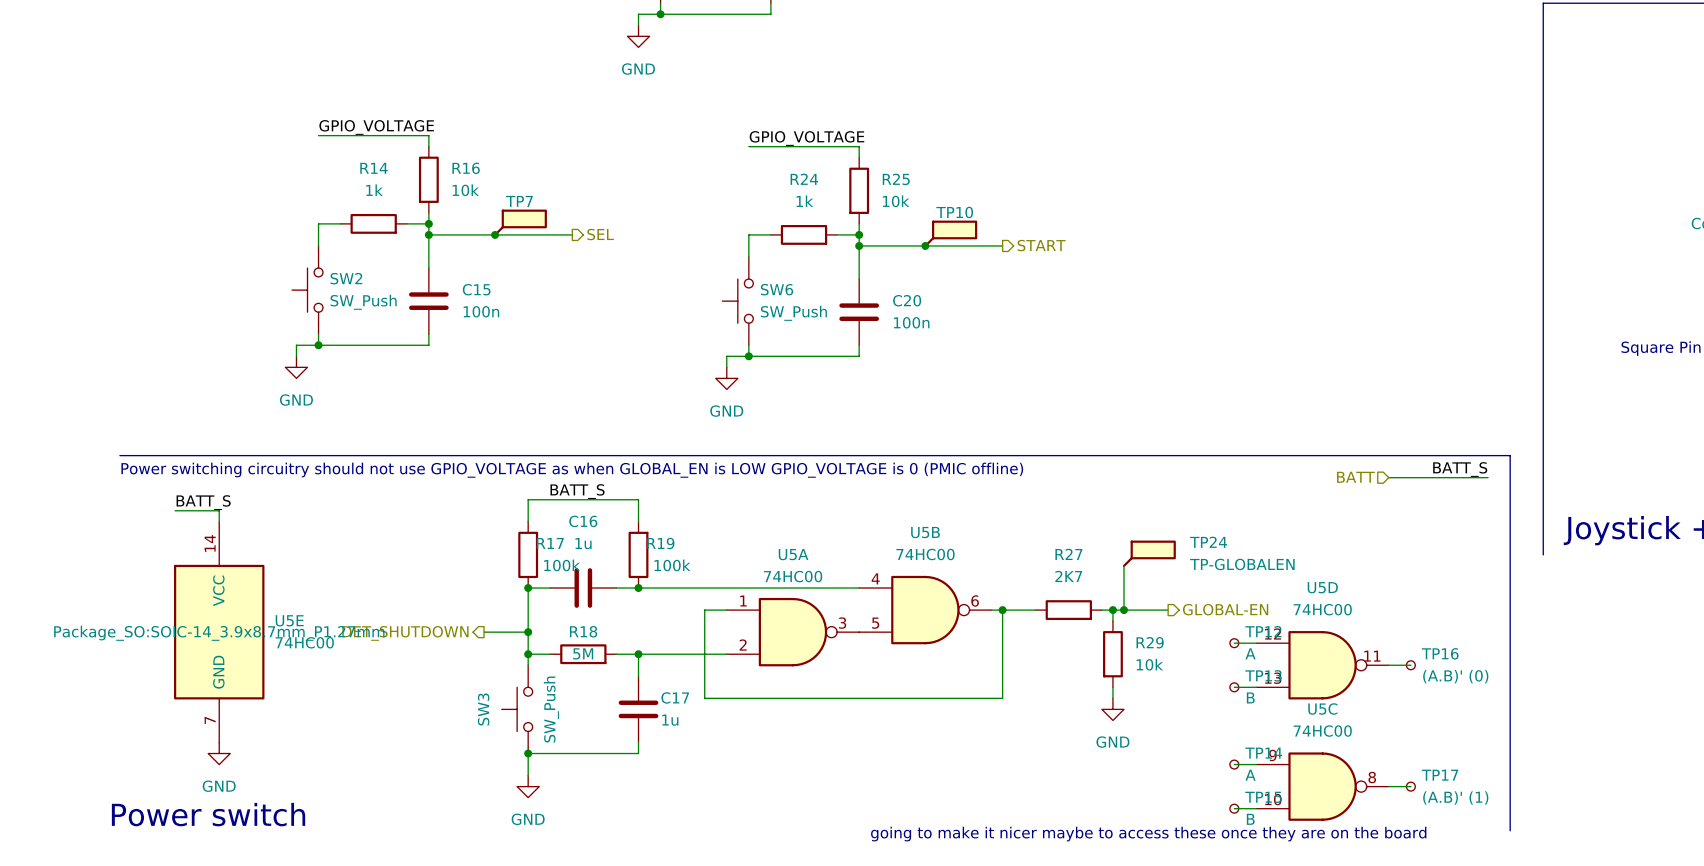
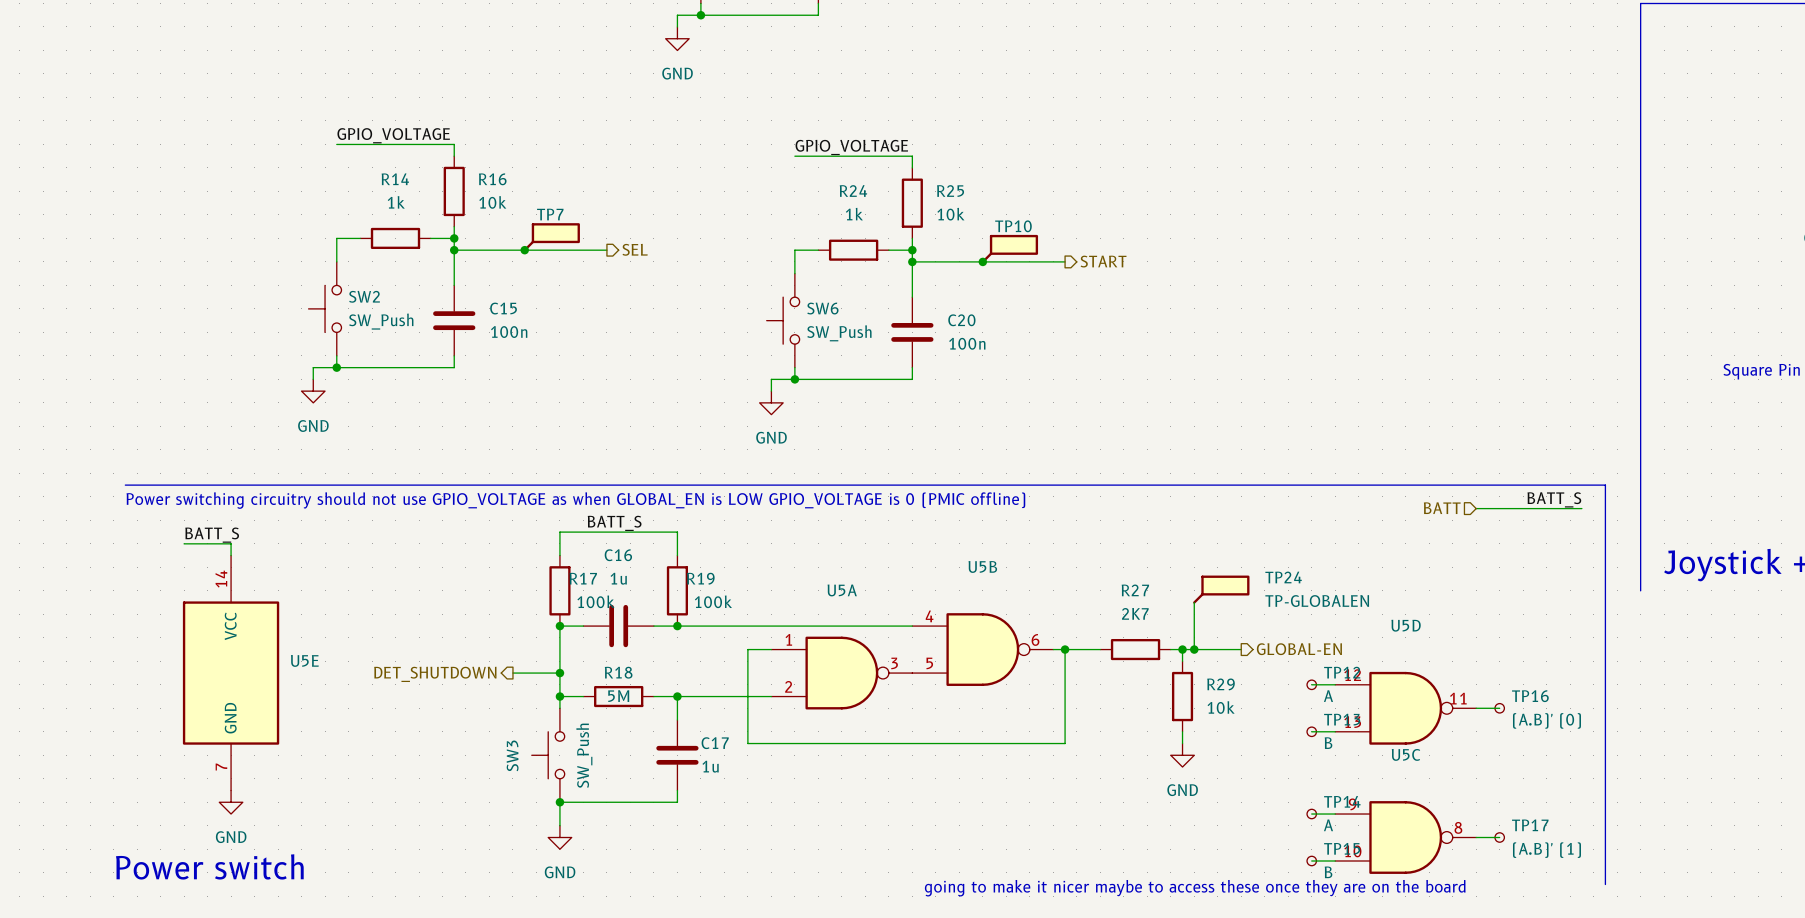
U5B value: 74HC00 (925, 554) -> none
U5A value: 74HC00 (793, 576) -> none
U5D value: 74HC00 (1322, 609) -> none
U5E text: Package_SO:SOIC-14_3.9x8.7mm_P1.27mm (219, 633) -> none
U5E value: 74HC00 (304, 642) -> none
U5C value: 74HC00 (1322, 731) -> none

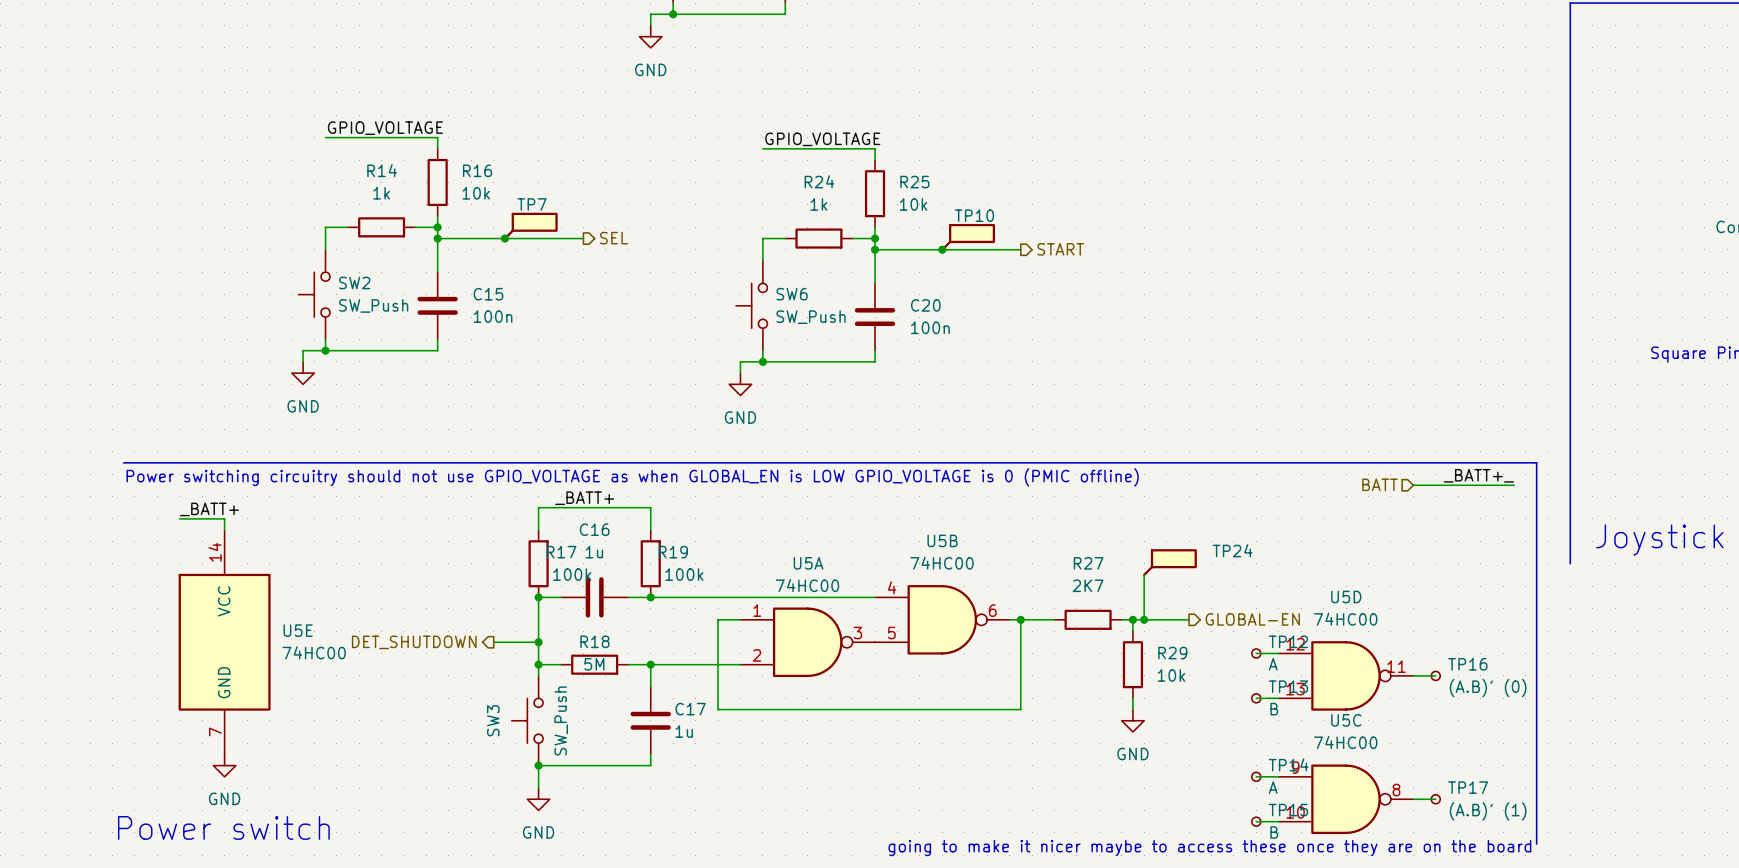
label: BATT_S (1554, 499) -> _BATT+_ (1478, 475)
label: BATT_S (614, 523) -> _BATT+ (584, 498)
label: BATT_S (212, 535) -> _BATT+ (209, 509)
U5B value: none -> 74HC00 (942, 563)
TP24 value: TP-GLOBALEN (1317, 601) -> none
U5A value: none -> 74HC00 (807, 585)
U5D value: none -> 74HC00 (1345, 619)
U5E value: none -> 74HC00 (314, 652)
U5C value: none -> 74HC00 (1345, 742)

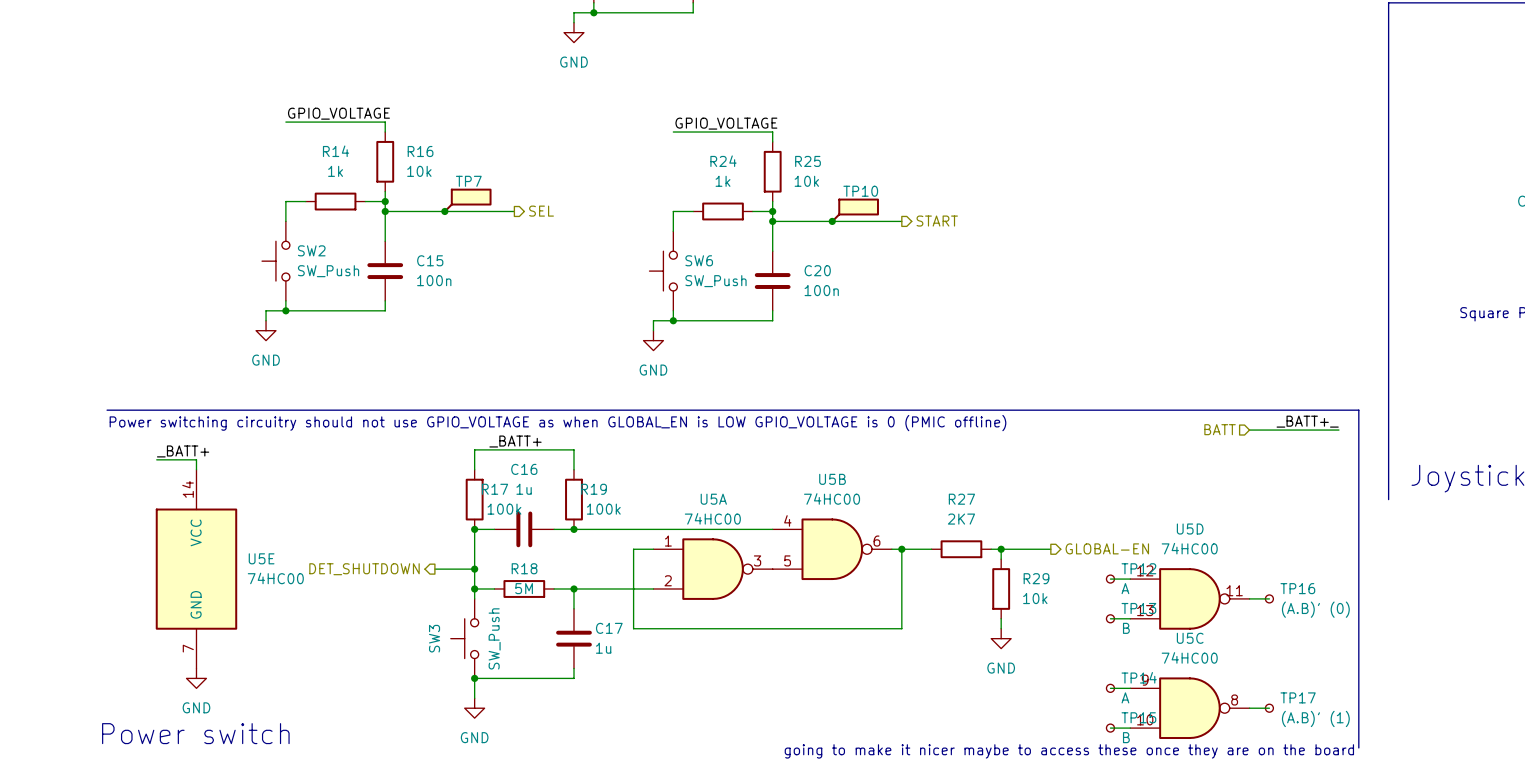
TP24: (1169, 562) -> none
wire: (1144, 574) (1144, 619) -> none
junction: (1144, 619) -> none

